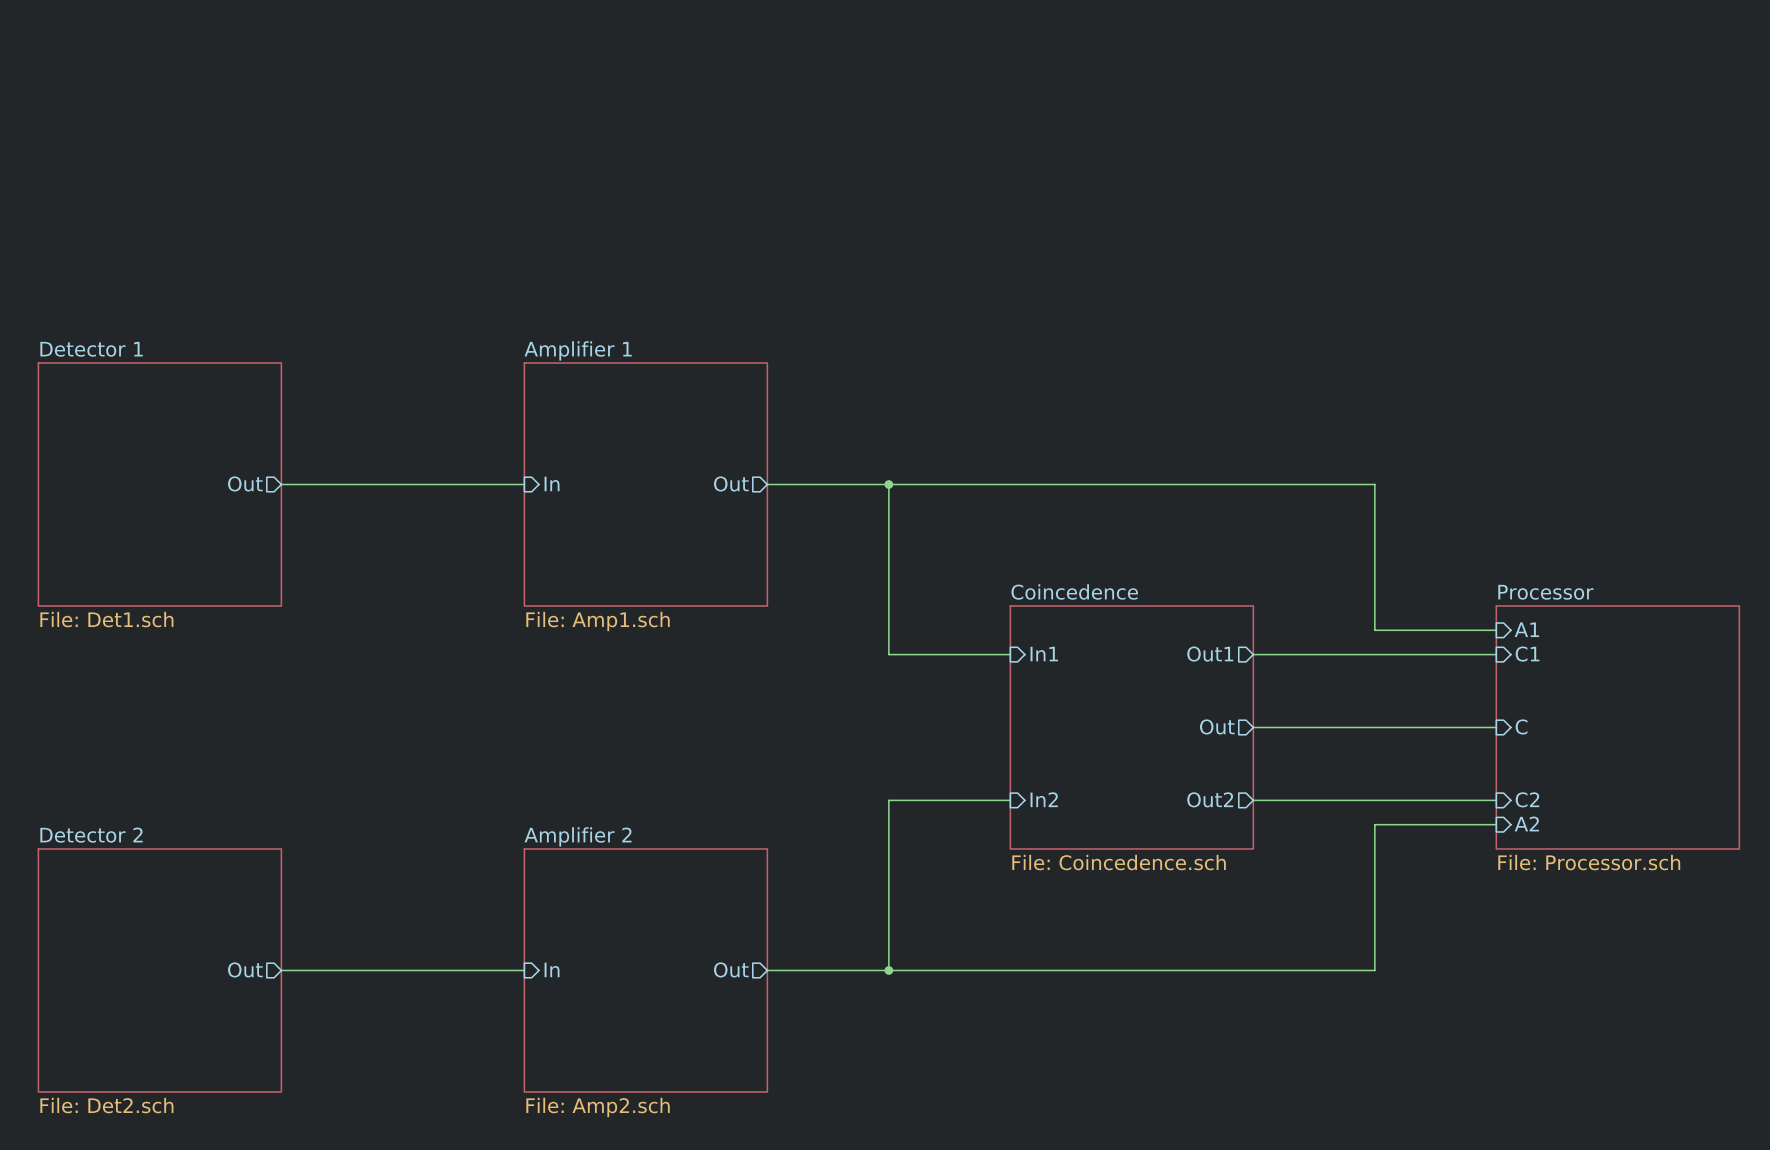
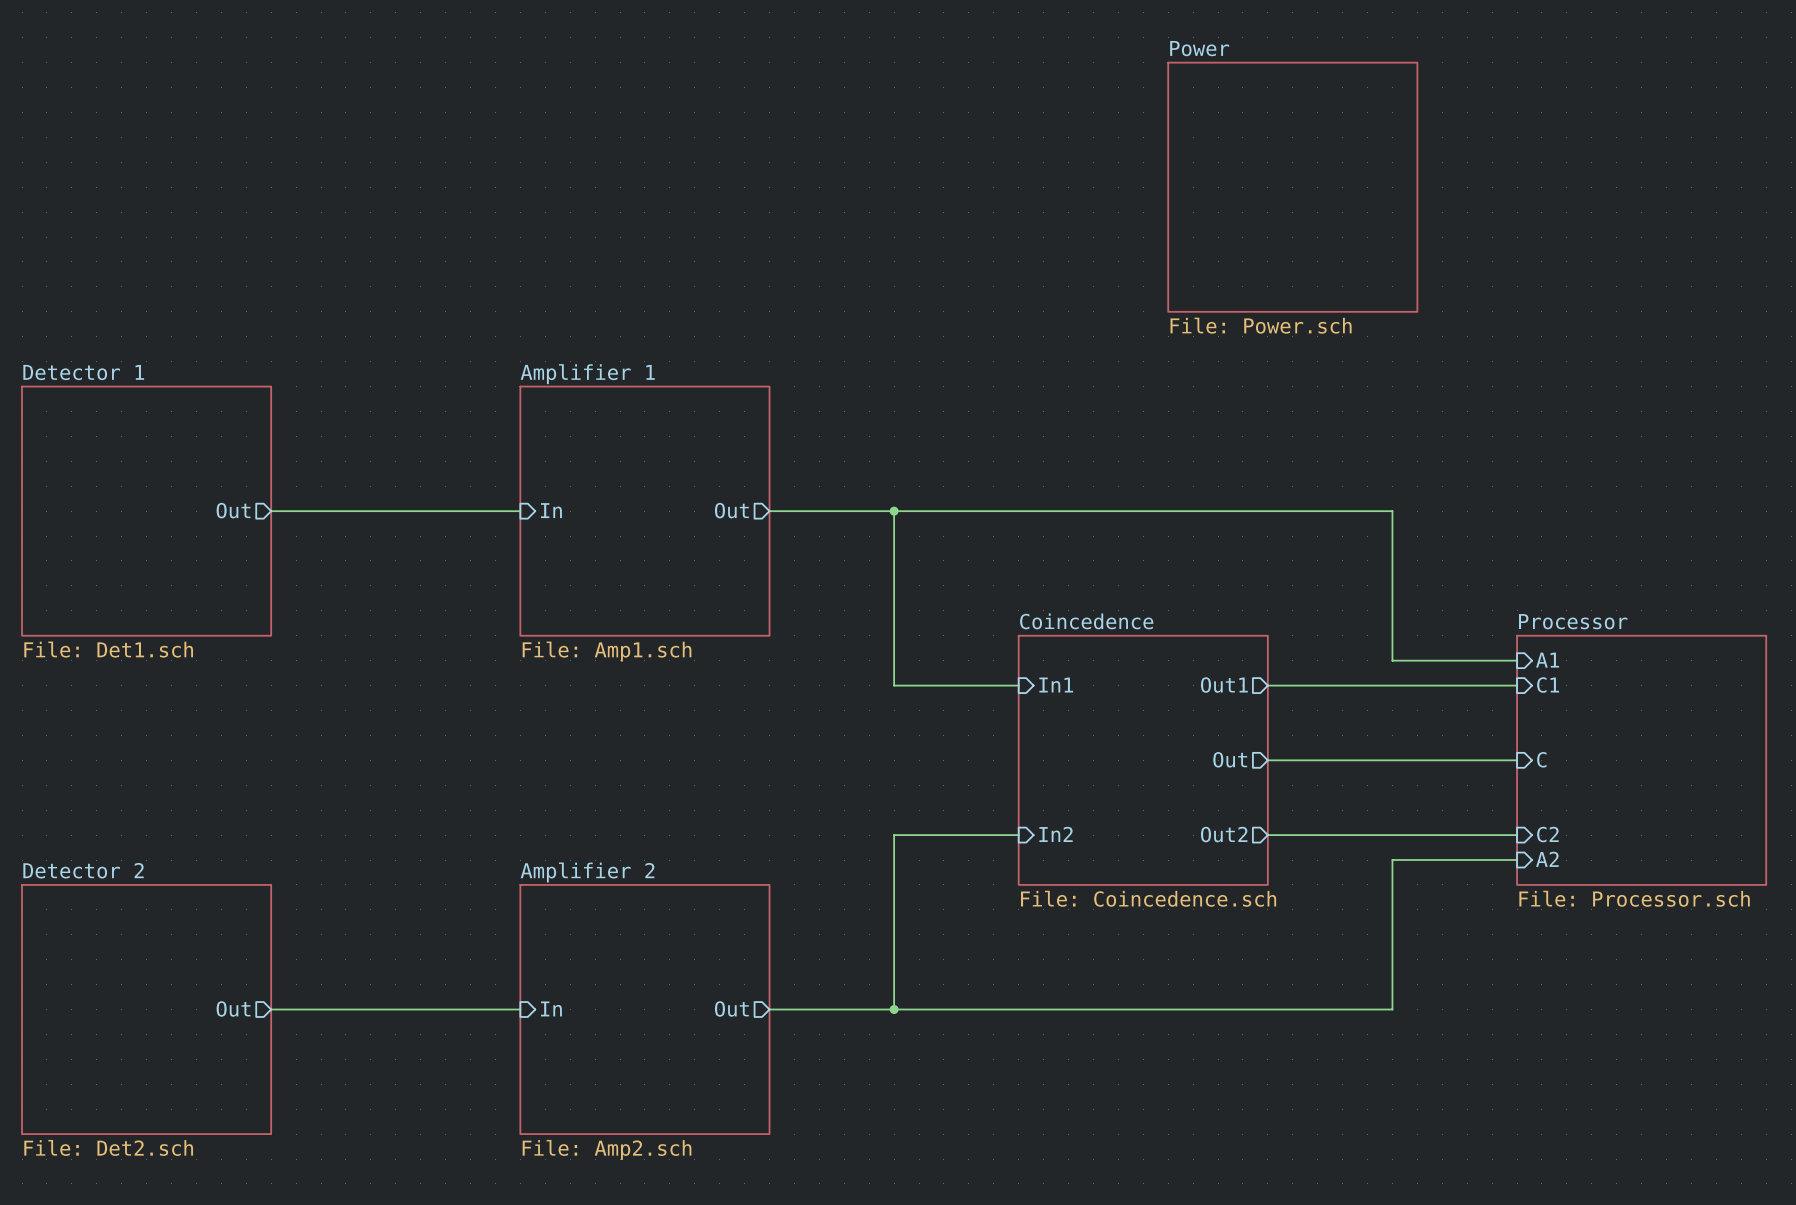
sheet Power: none -> File: Power.sch (1292, 187)

